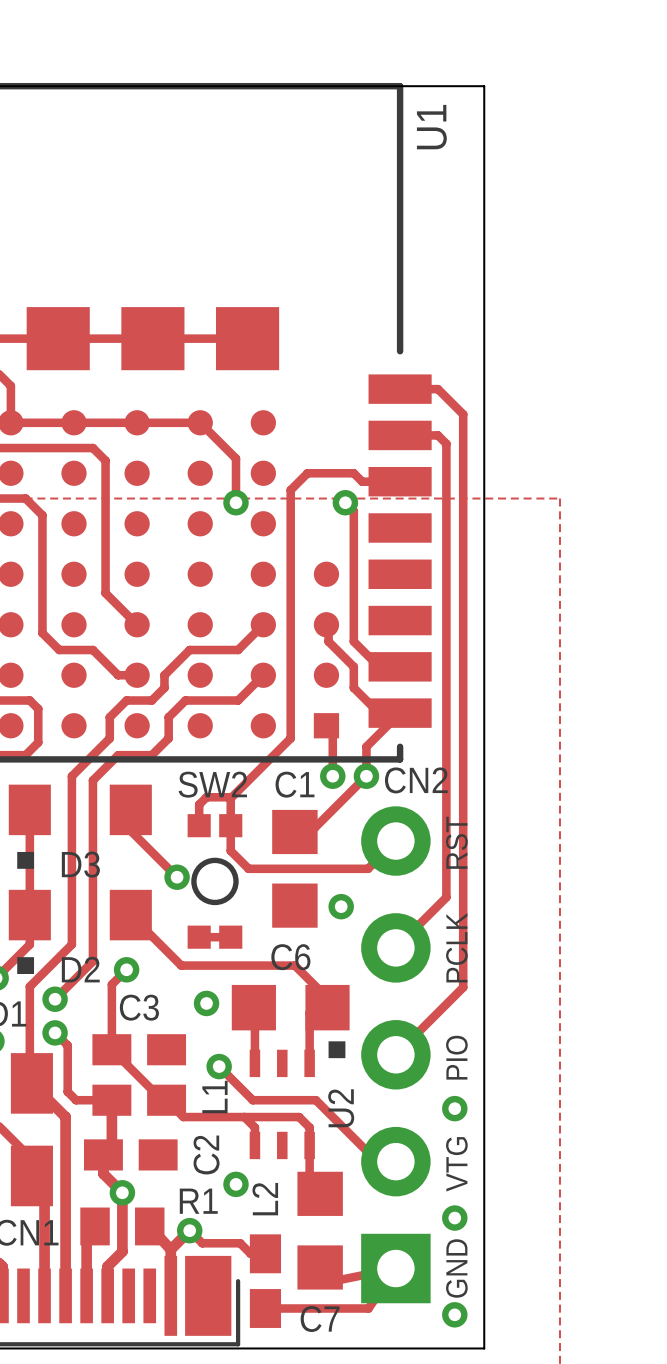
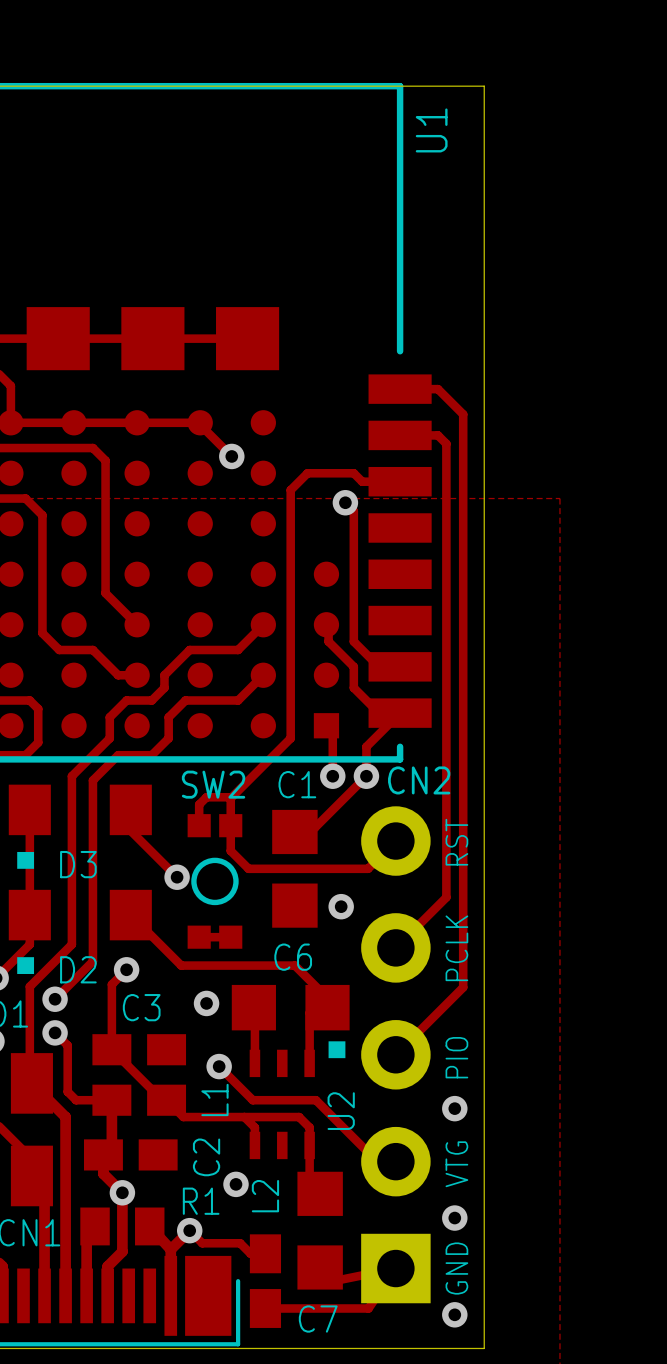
track: (200, 422) (236, 458) (236, 502) -> (200, 422) (231, 456)
via position: (236, 502) -> (231, 456)

